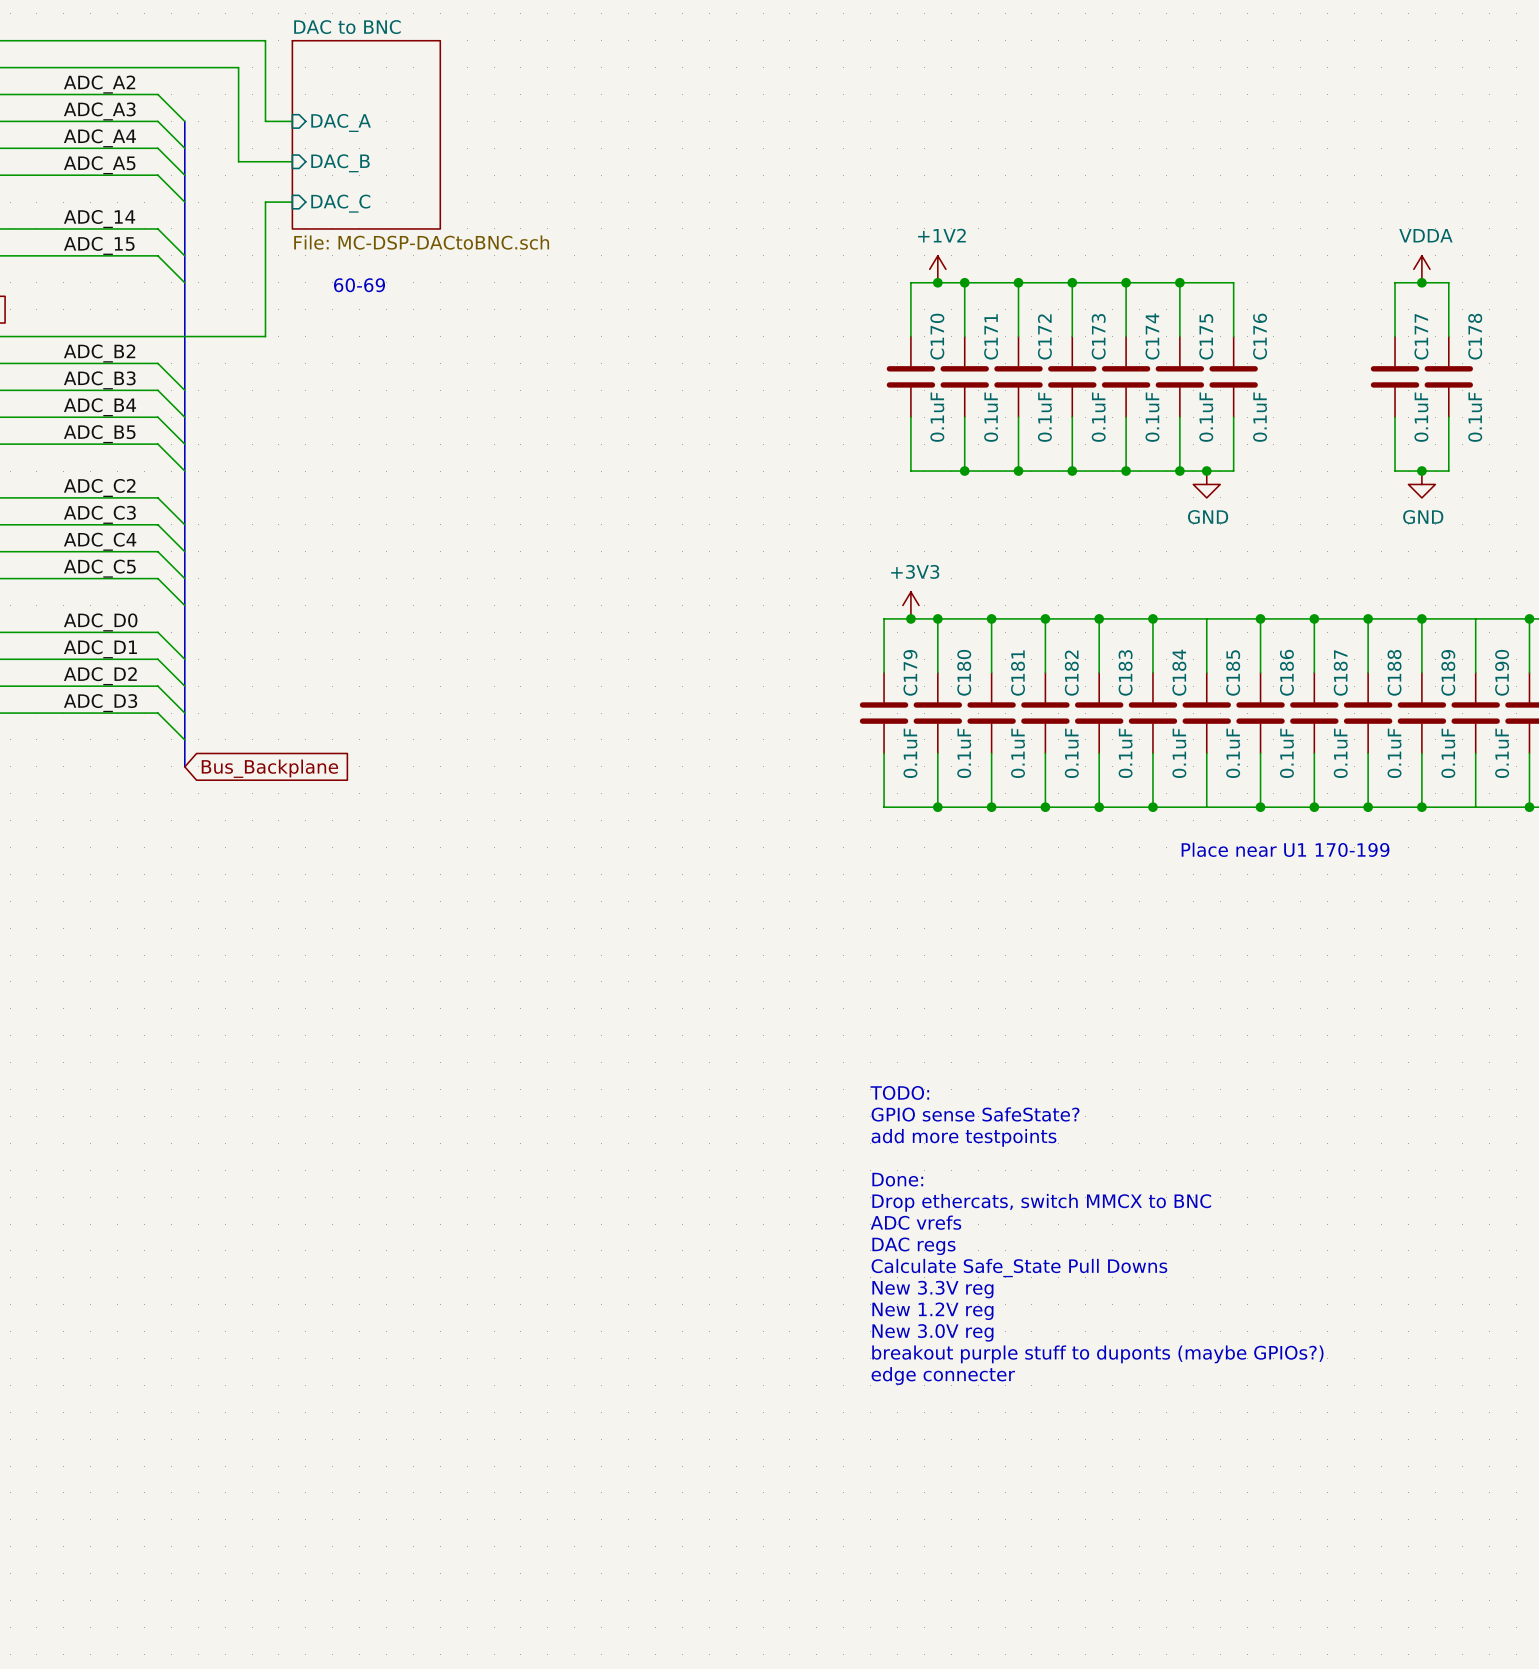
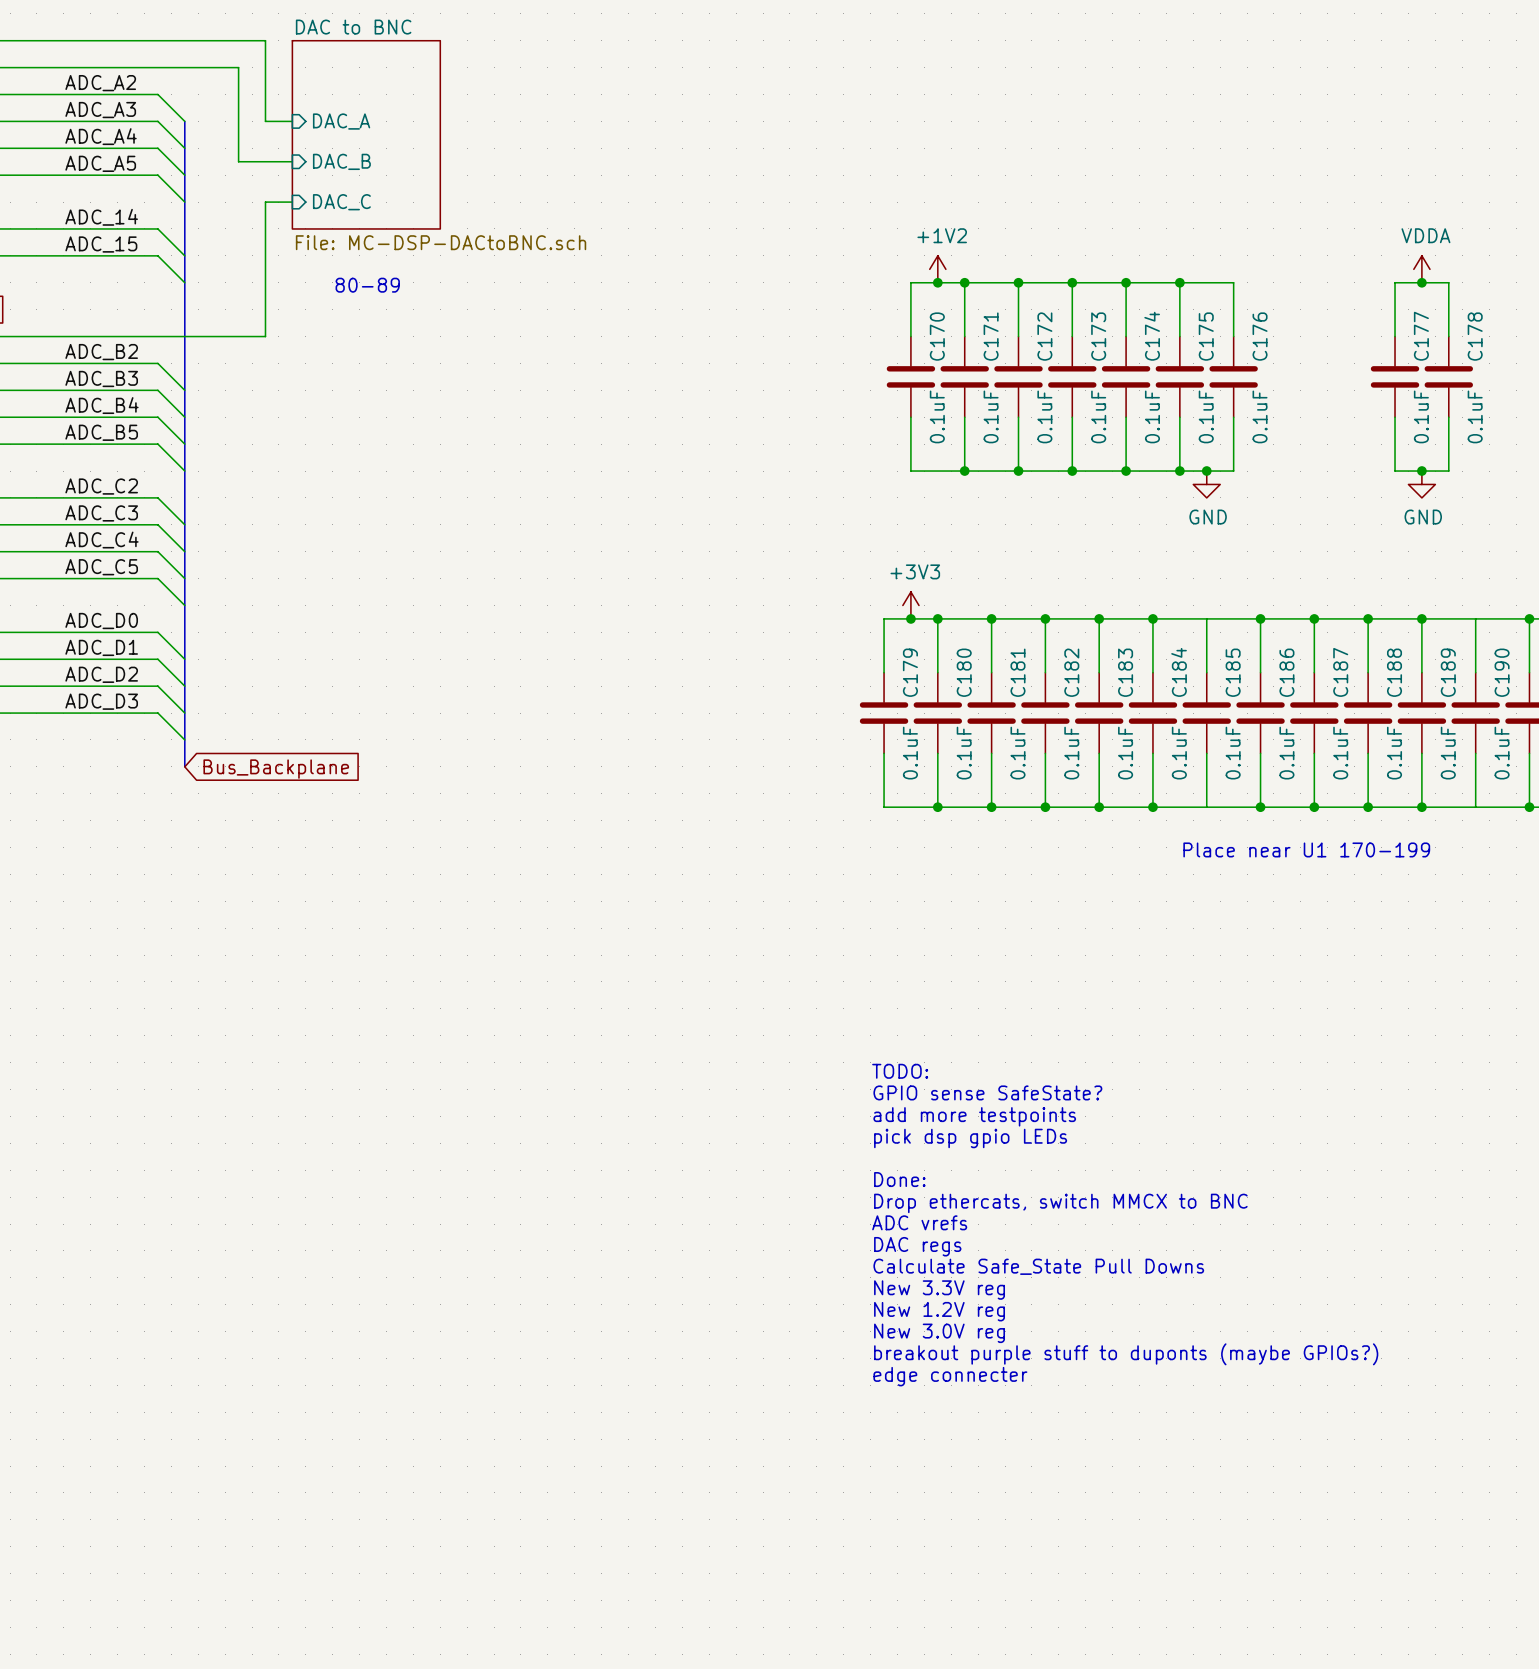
text: 60-69 (359, 285) -> 80-89 (367, 285)
text: none -> TODO: (900, 1071)
text: TODO: (899, 1092) -> GPIO sense SafeState? (987, 1092)
text: GPIO sense SafeState? (975, 1114) -> add more testpoints (974, 1116)
text: add more testpoints (964, 1137) -> pick dsp gpio LEDs (970, 1138)

